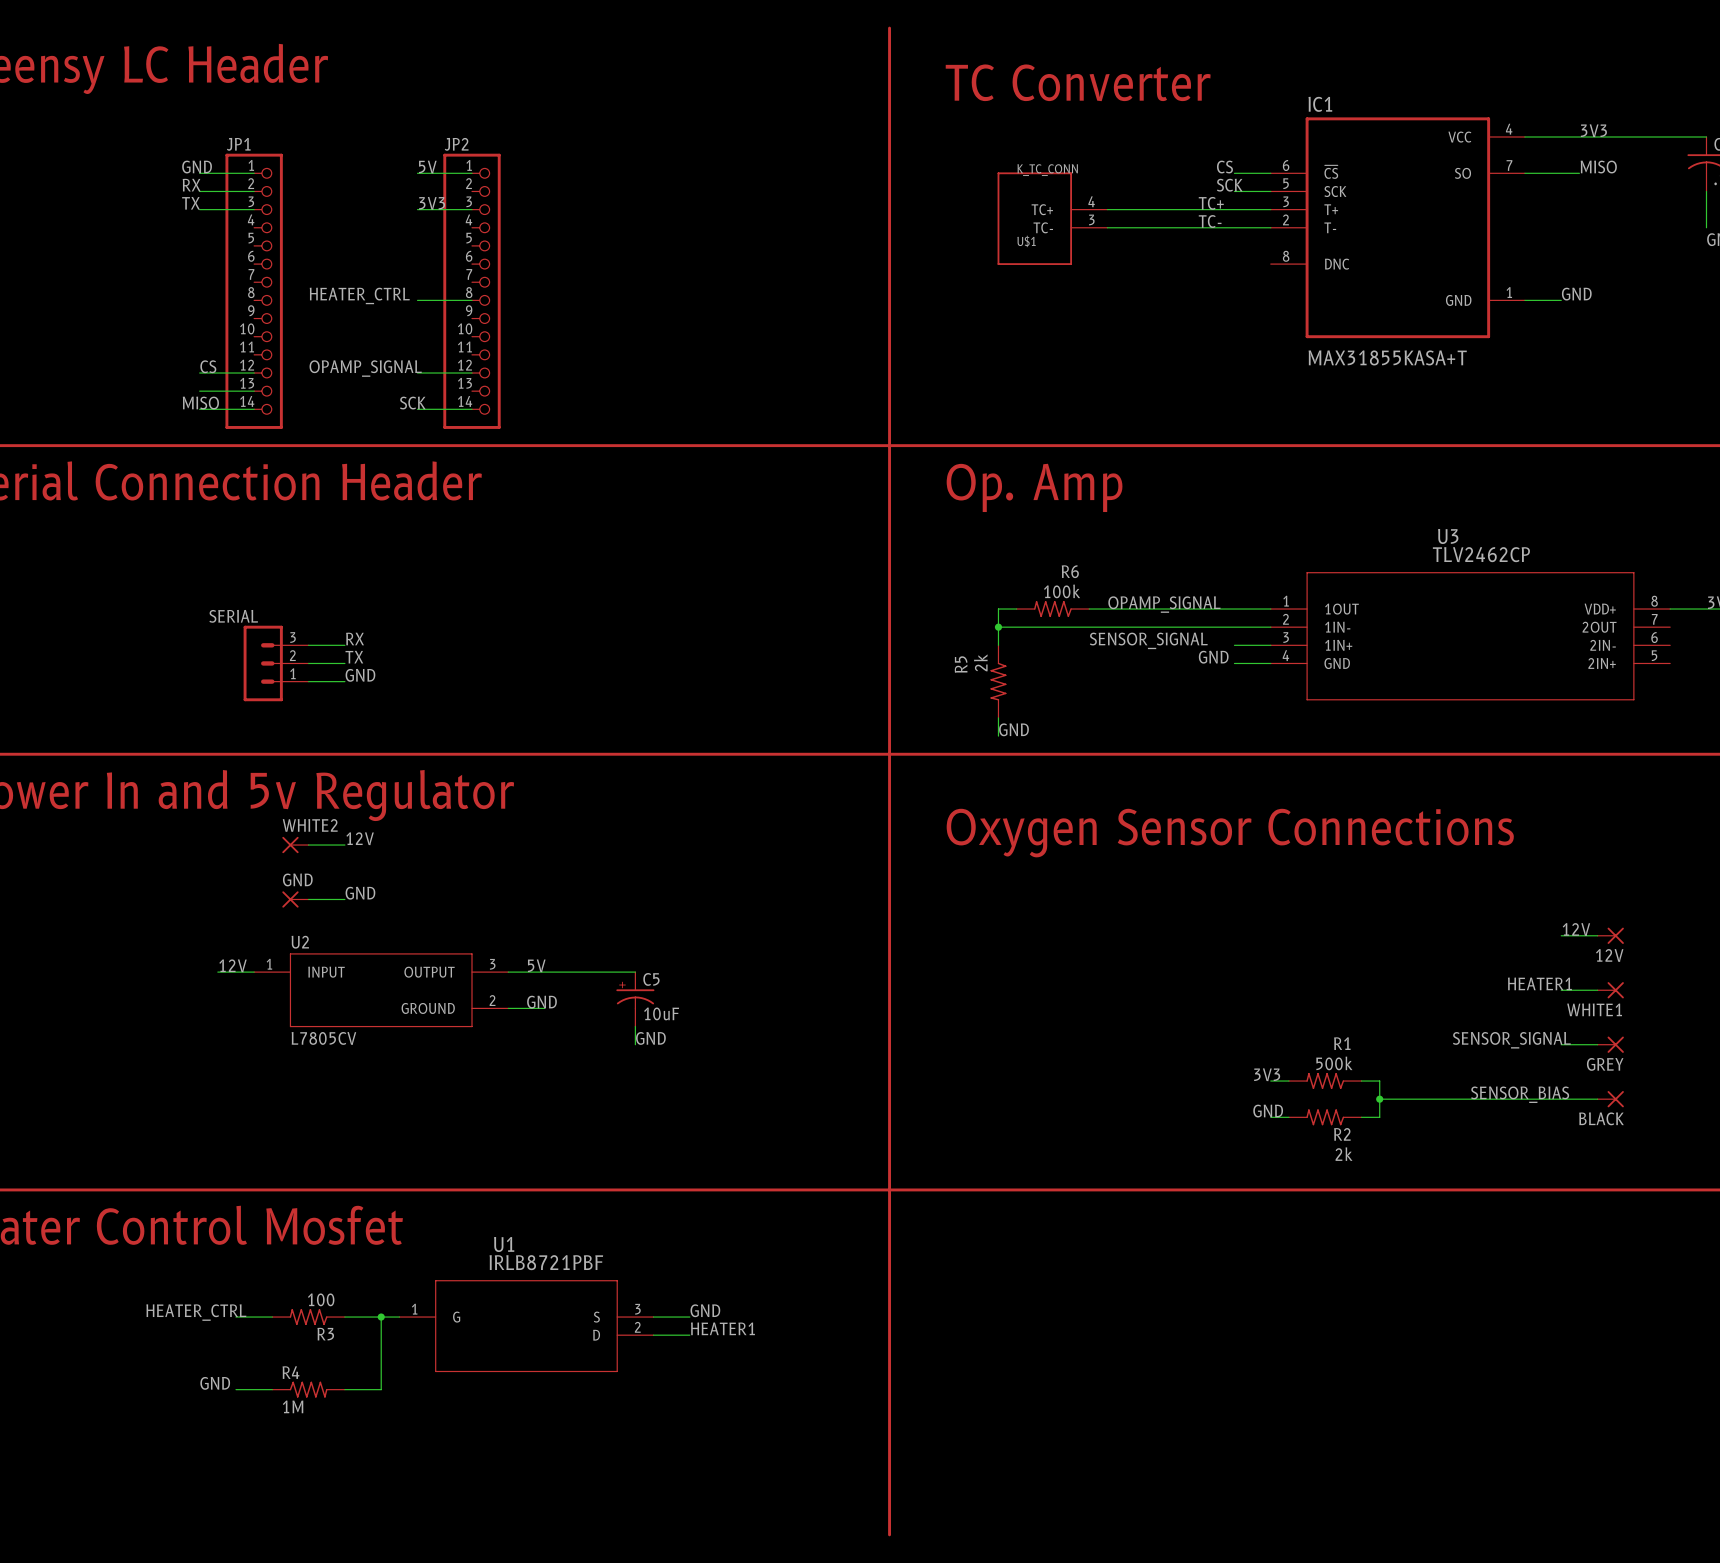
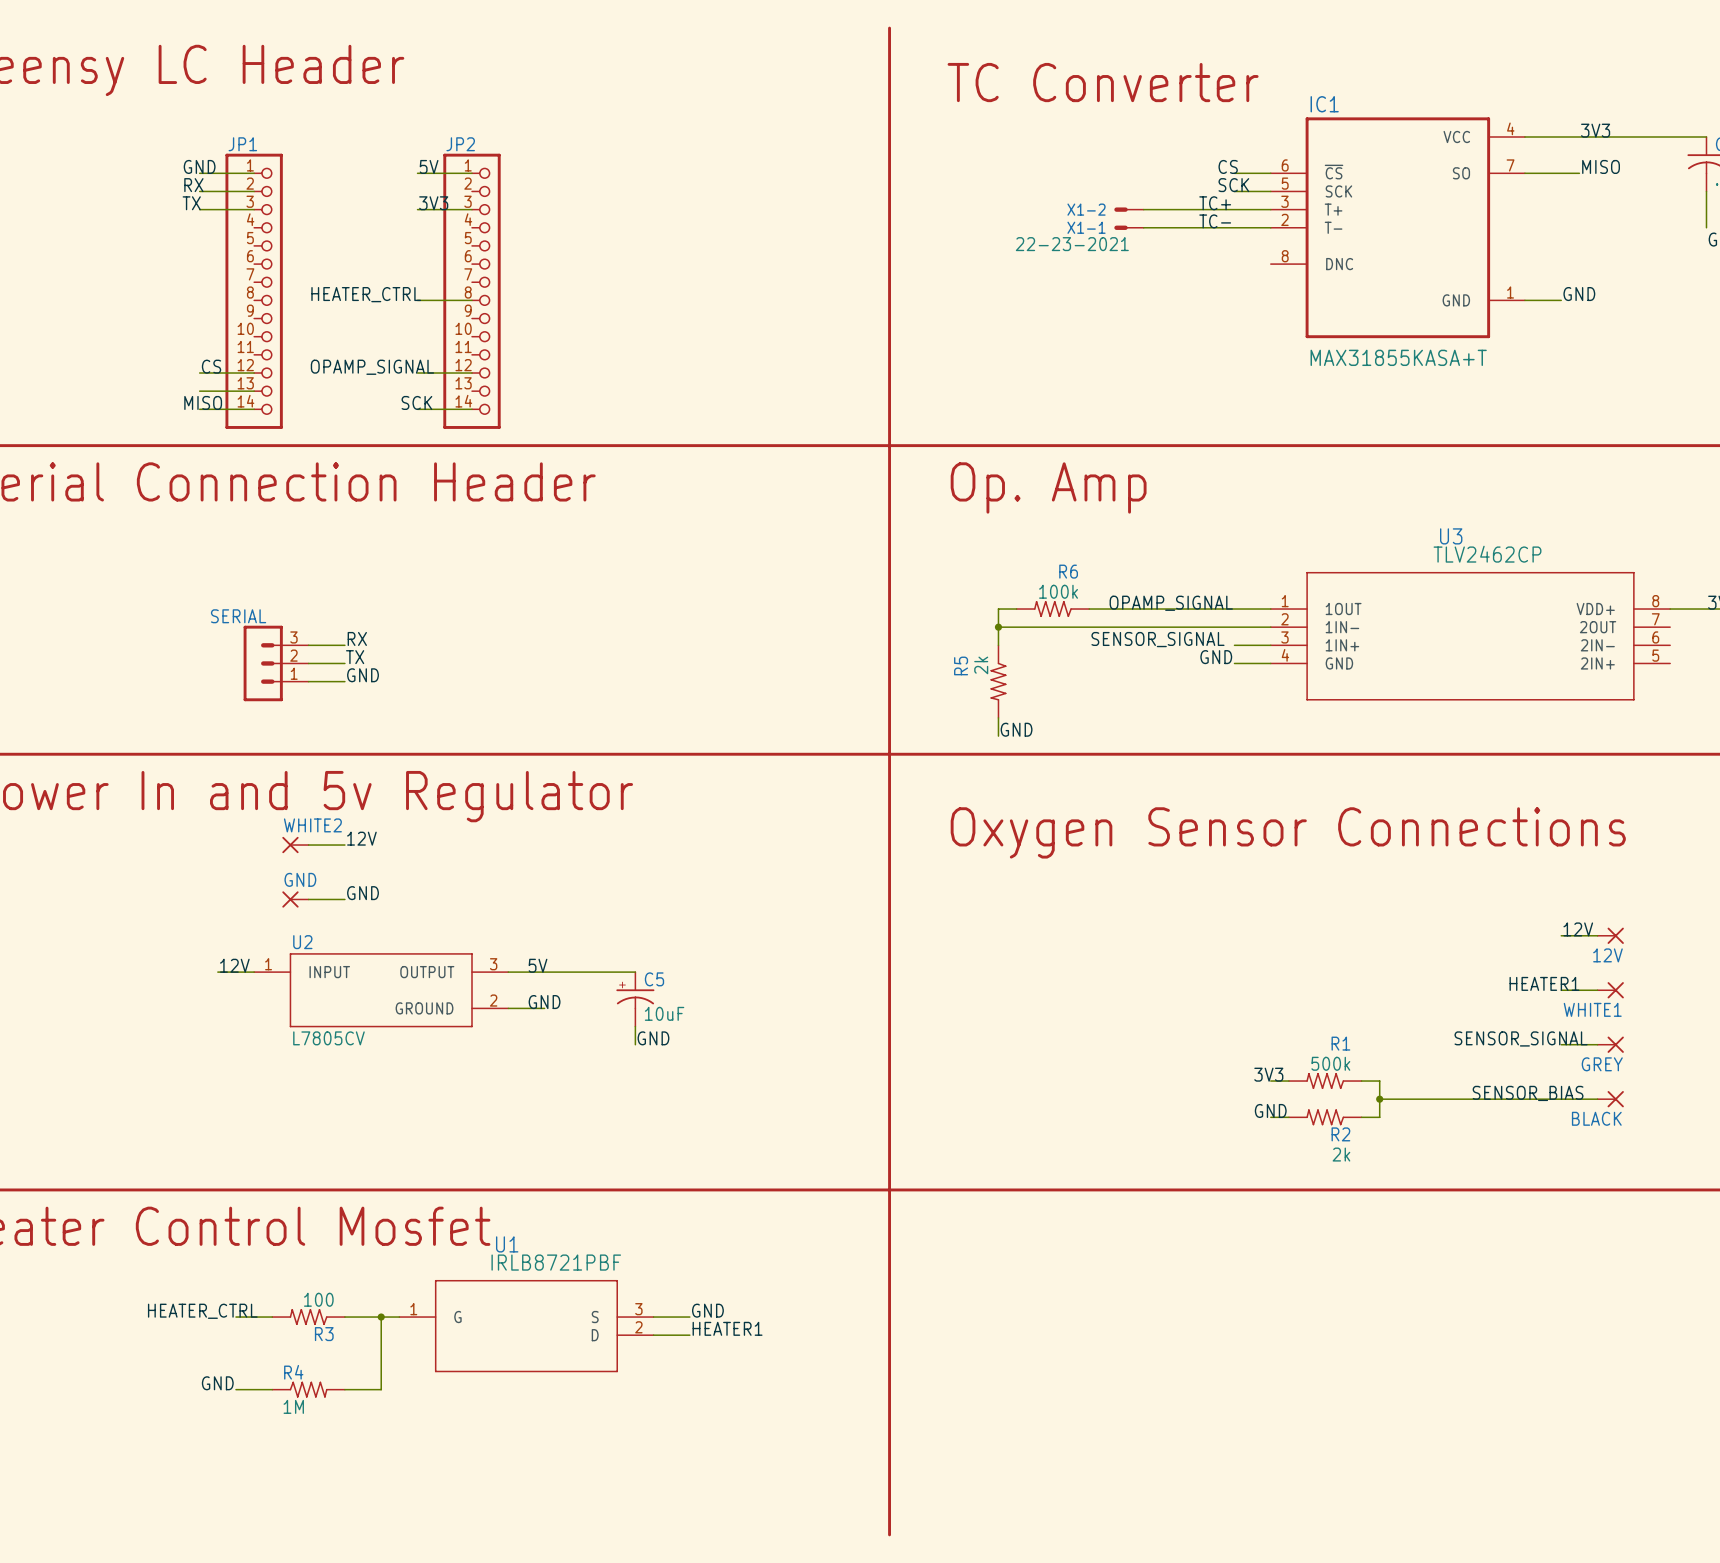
X1-2: none -> (1129, 209)
U$1: K_TC_CONN (1052, 218) -> none
X1-1: none -> 22-23-2021 (1129, 227)

